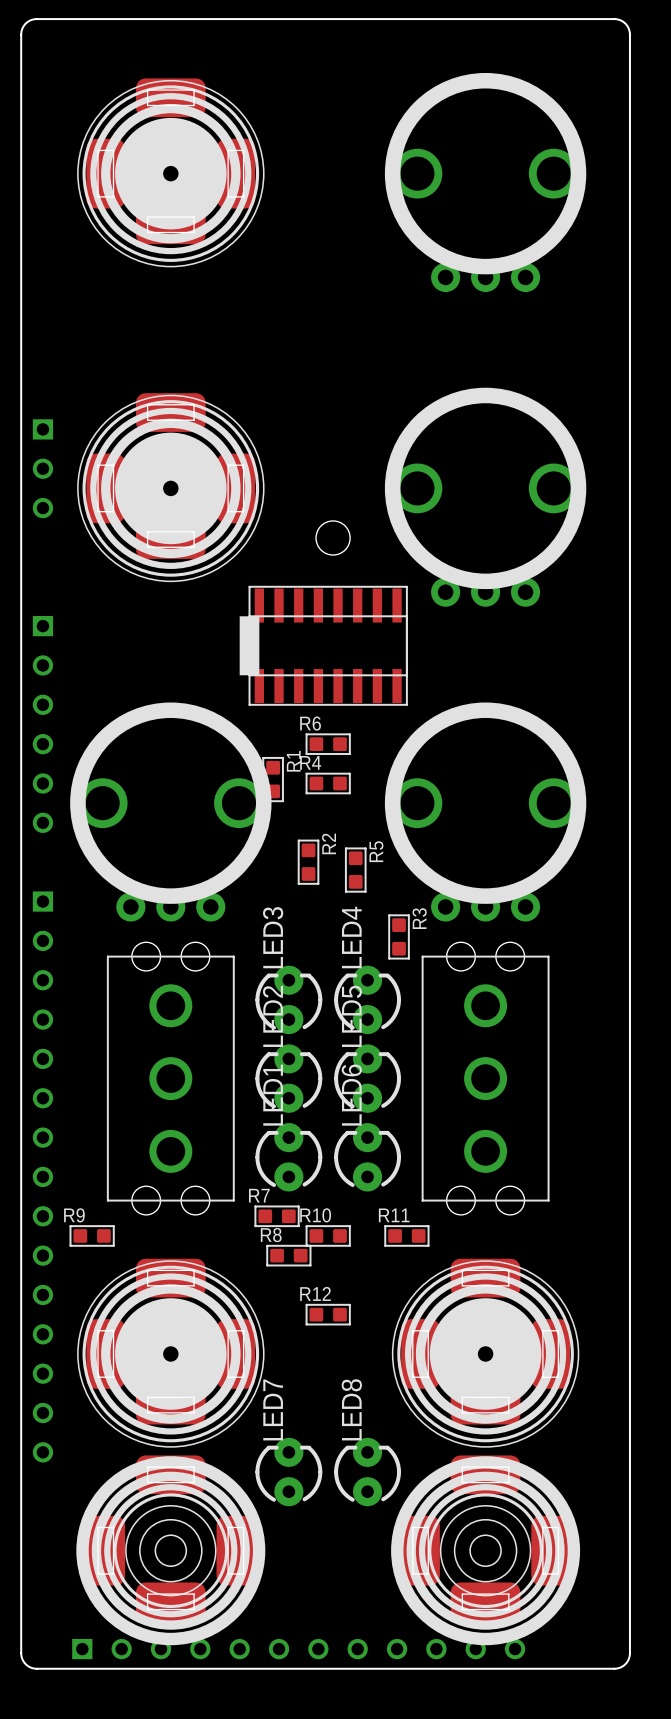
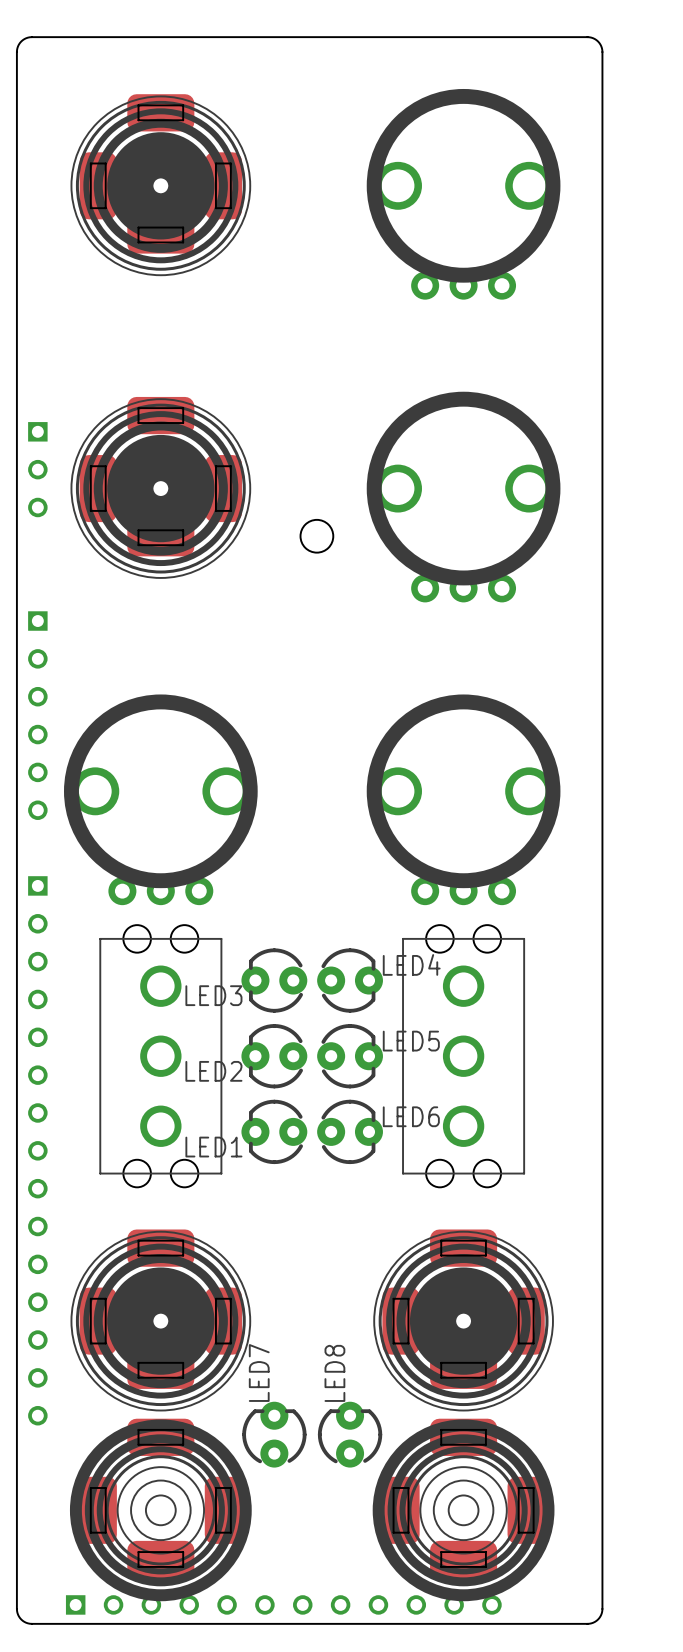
part: (323, 645) -> none
R6: (328, 744) -> none
R1: (273, 779) -> none
R4: (328, 783) -> none
R2: (308, 862) -> none
R5: (355, 870) -> none
R3: (399, 936) -> none
LED3 rotation: 0° (288, 999) -> 90° counterclockwise (274, 980)
LED4 rotation: 0° (367, 999) -> 90° clockwise (350, 980)
LED2 rotation: 0° (288, 1078) -> 90° counterclockwise (274, 1056)
LED5 rotation: 0° (367, 1078) -> 90° clockwise (350, 1056)
LED1 rotation: 0° (288, 1157) -> 90° counterclockwise (274, 1131)
LED6 rotation: 0° (367, 1157) -> 90° clockwise (350, 1131)
R7: (277, 1216) -> none
R9: (92, 1235) -> none
R10: (328, 1235) -> none
R11: (406, 1235) -> none
R8: (288, 1255) -> none
R12: (328, 1314) -> none

